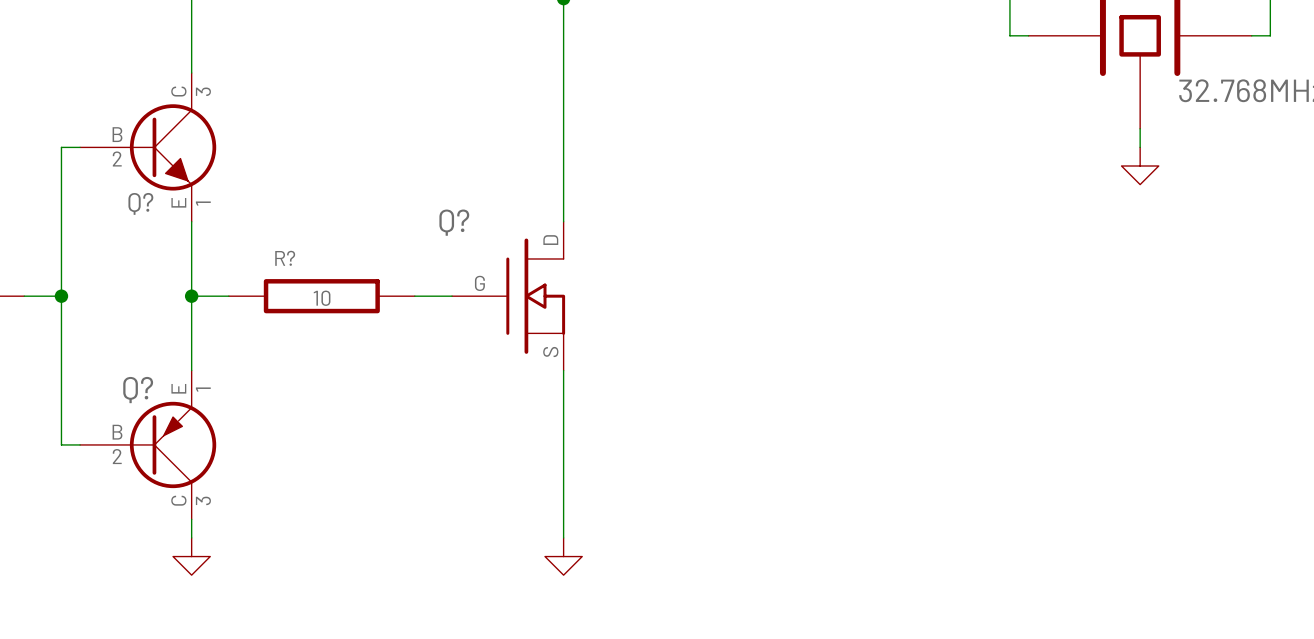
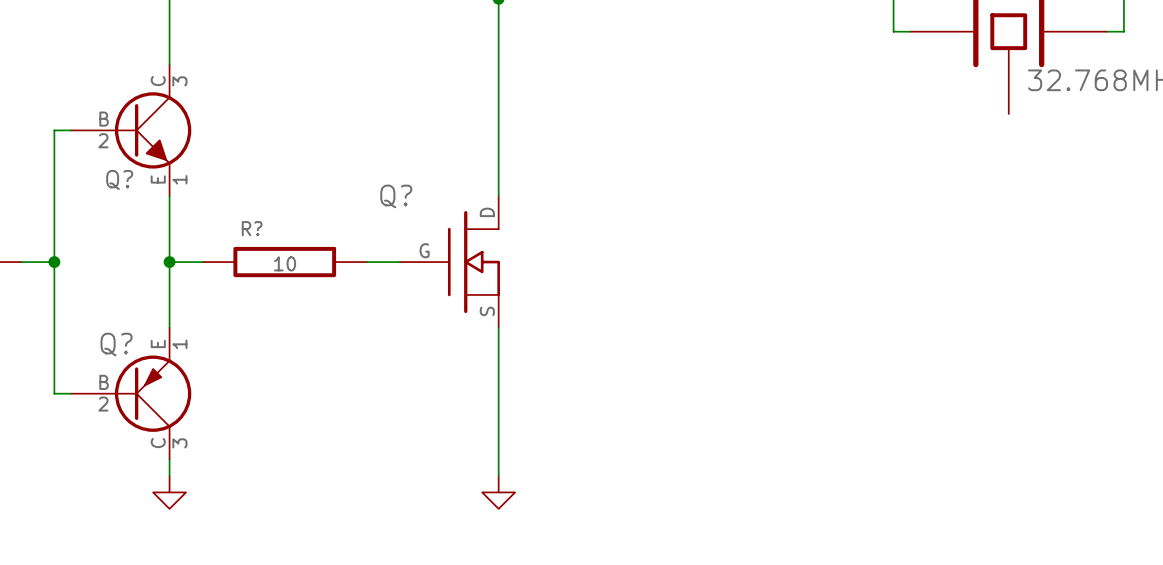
wire: (1140, 128) (1140, 147) -> none
power symbol: (1140, 166) -> none

